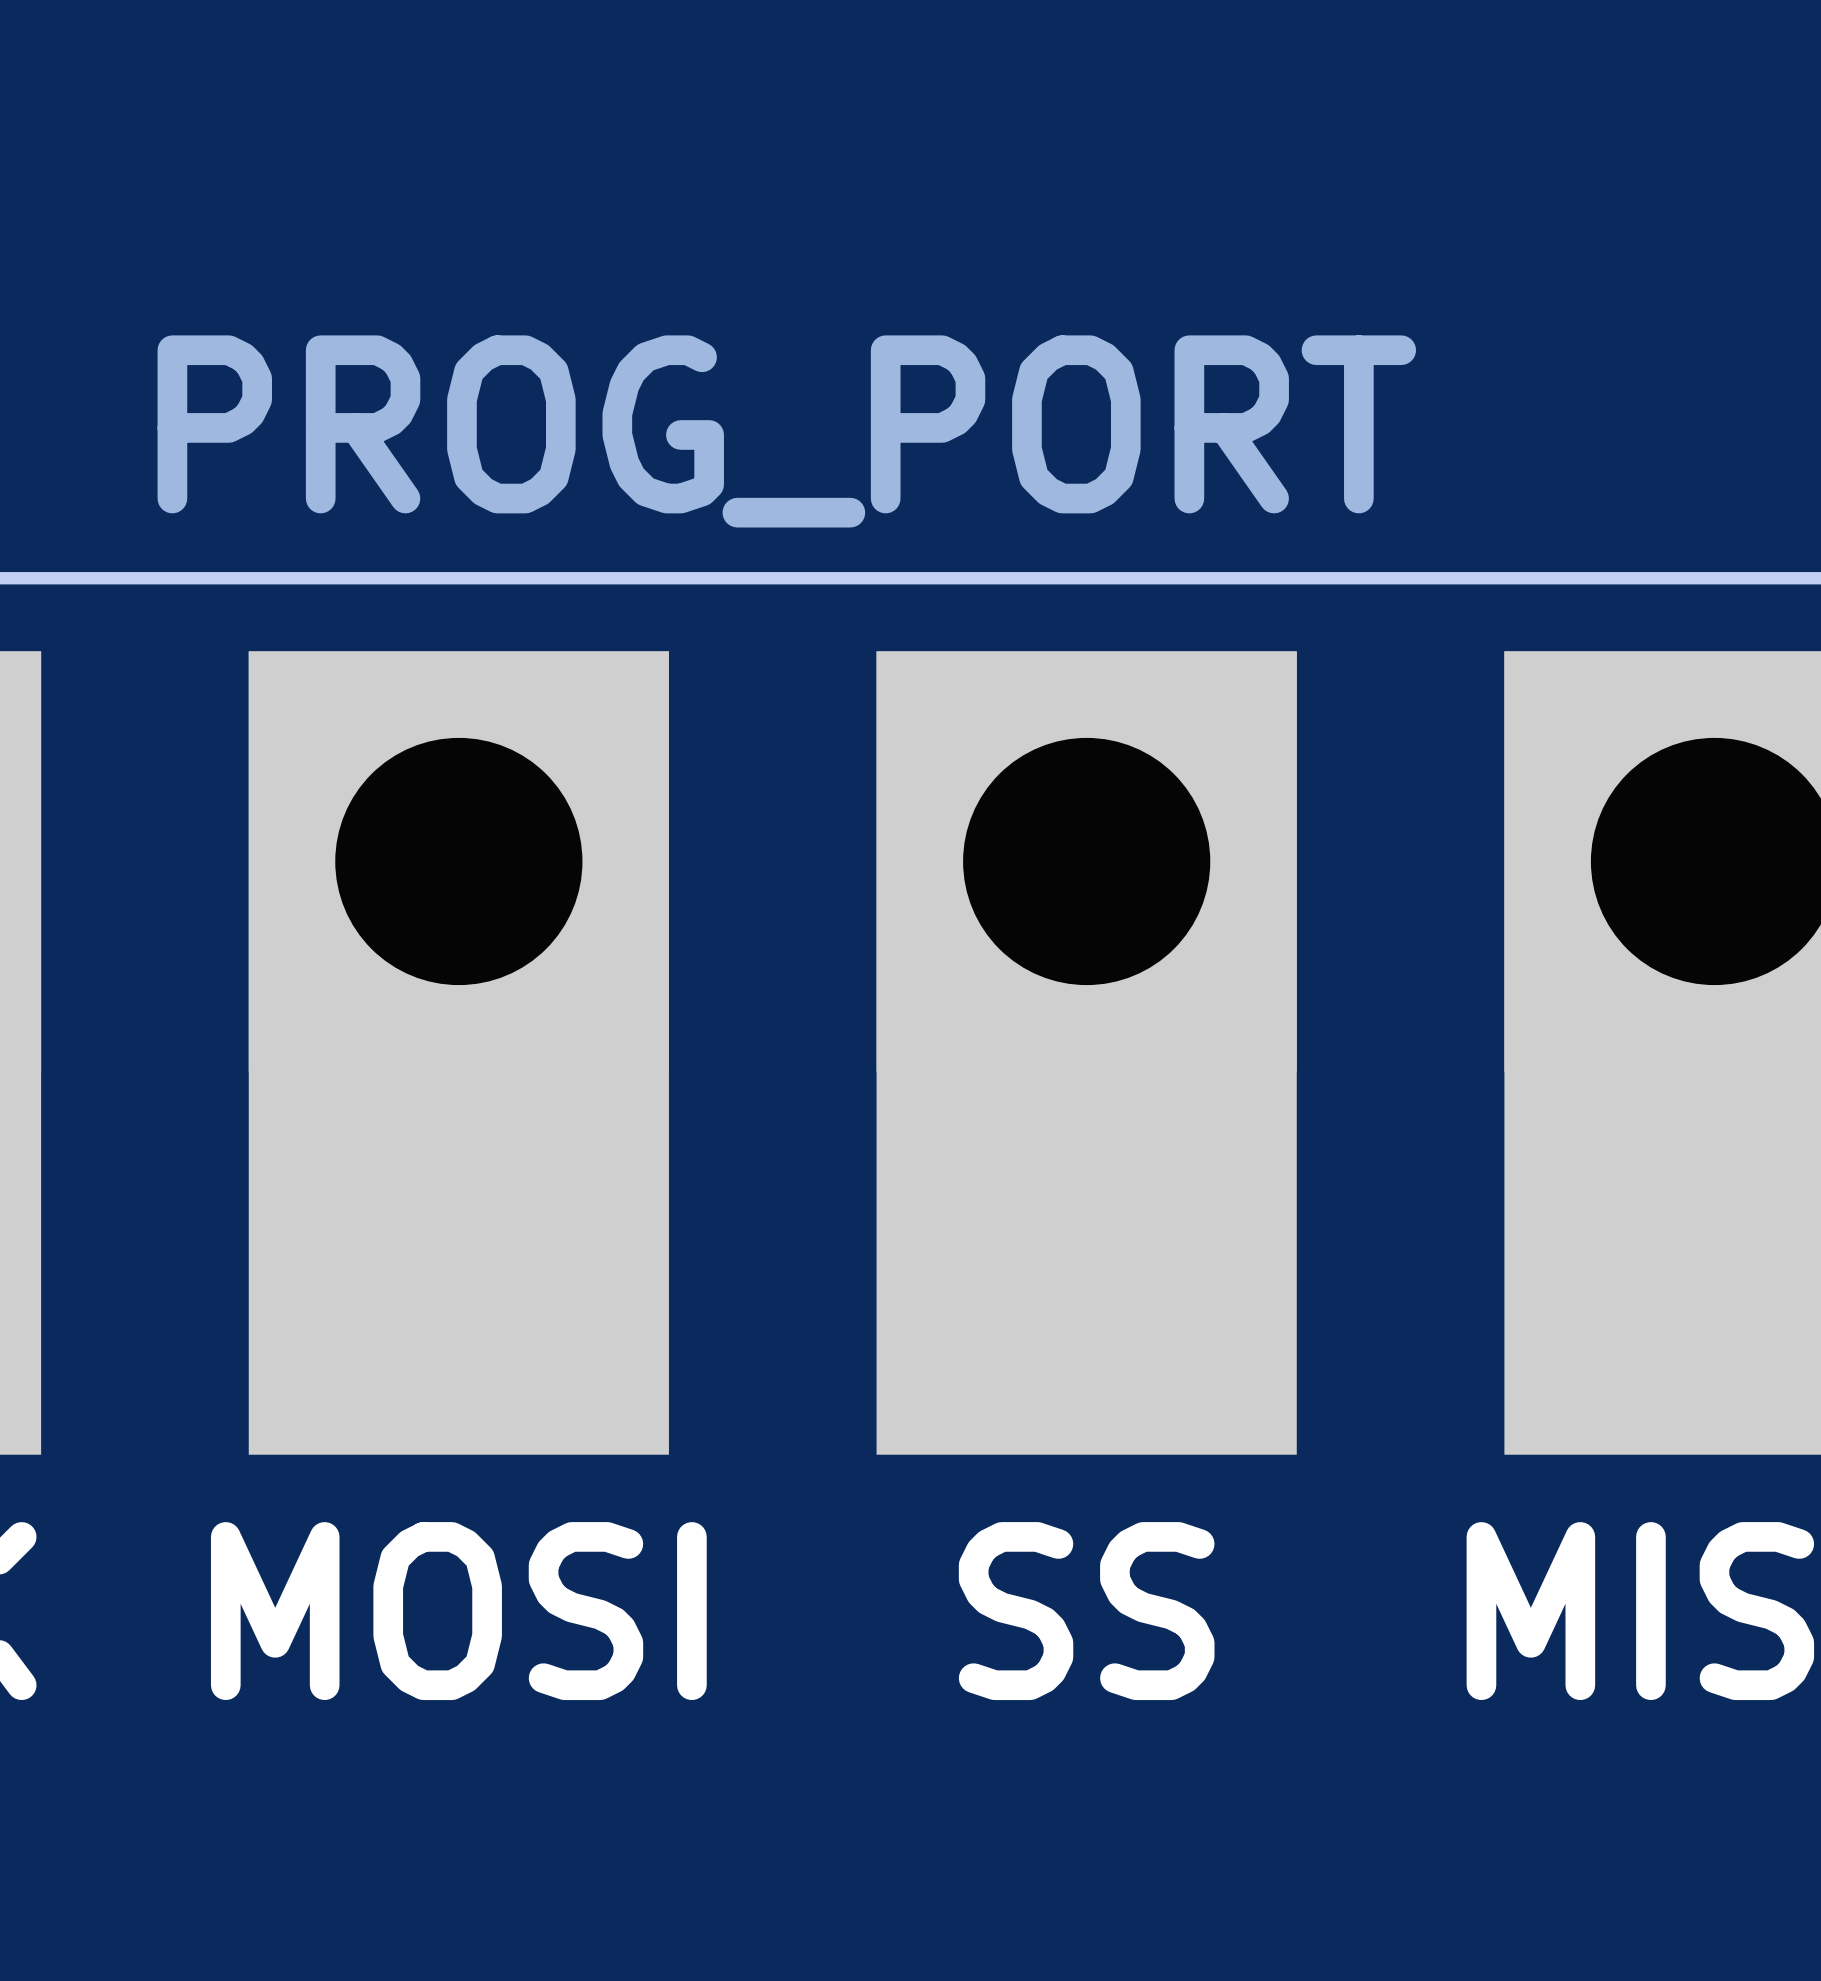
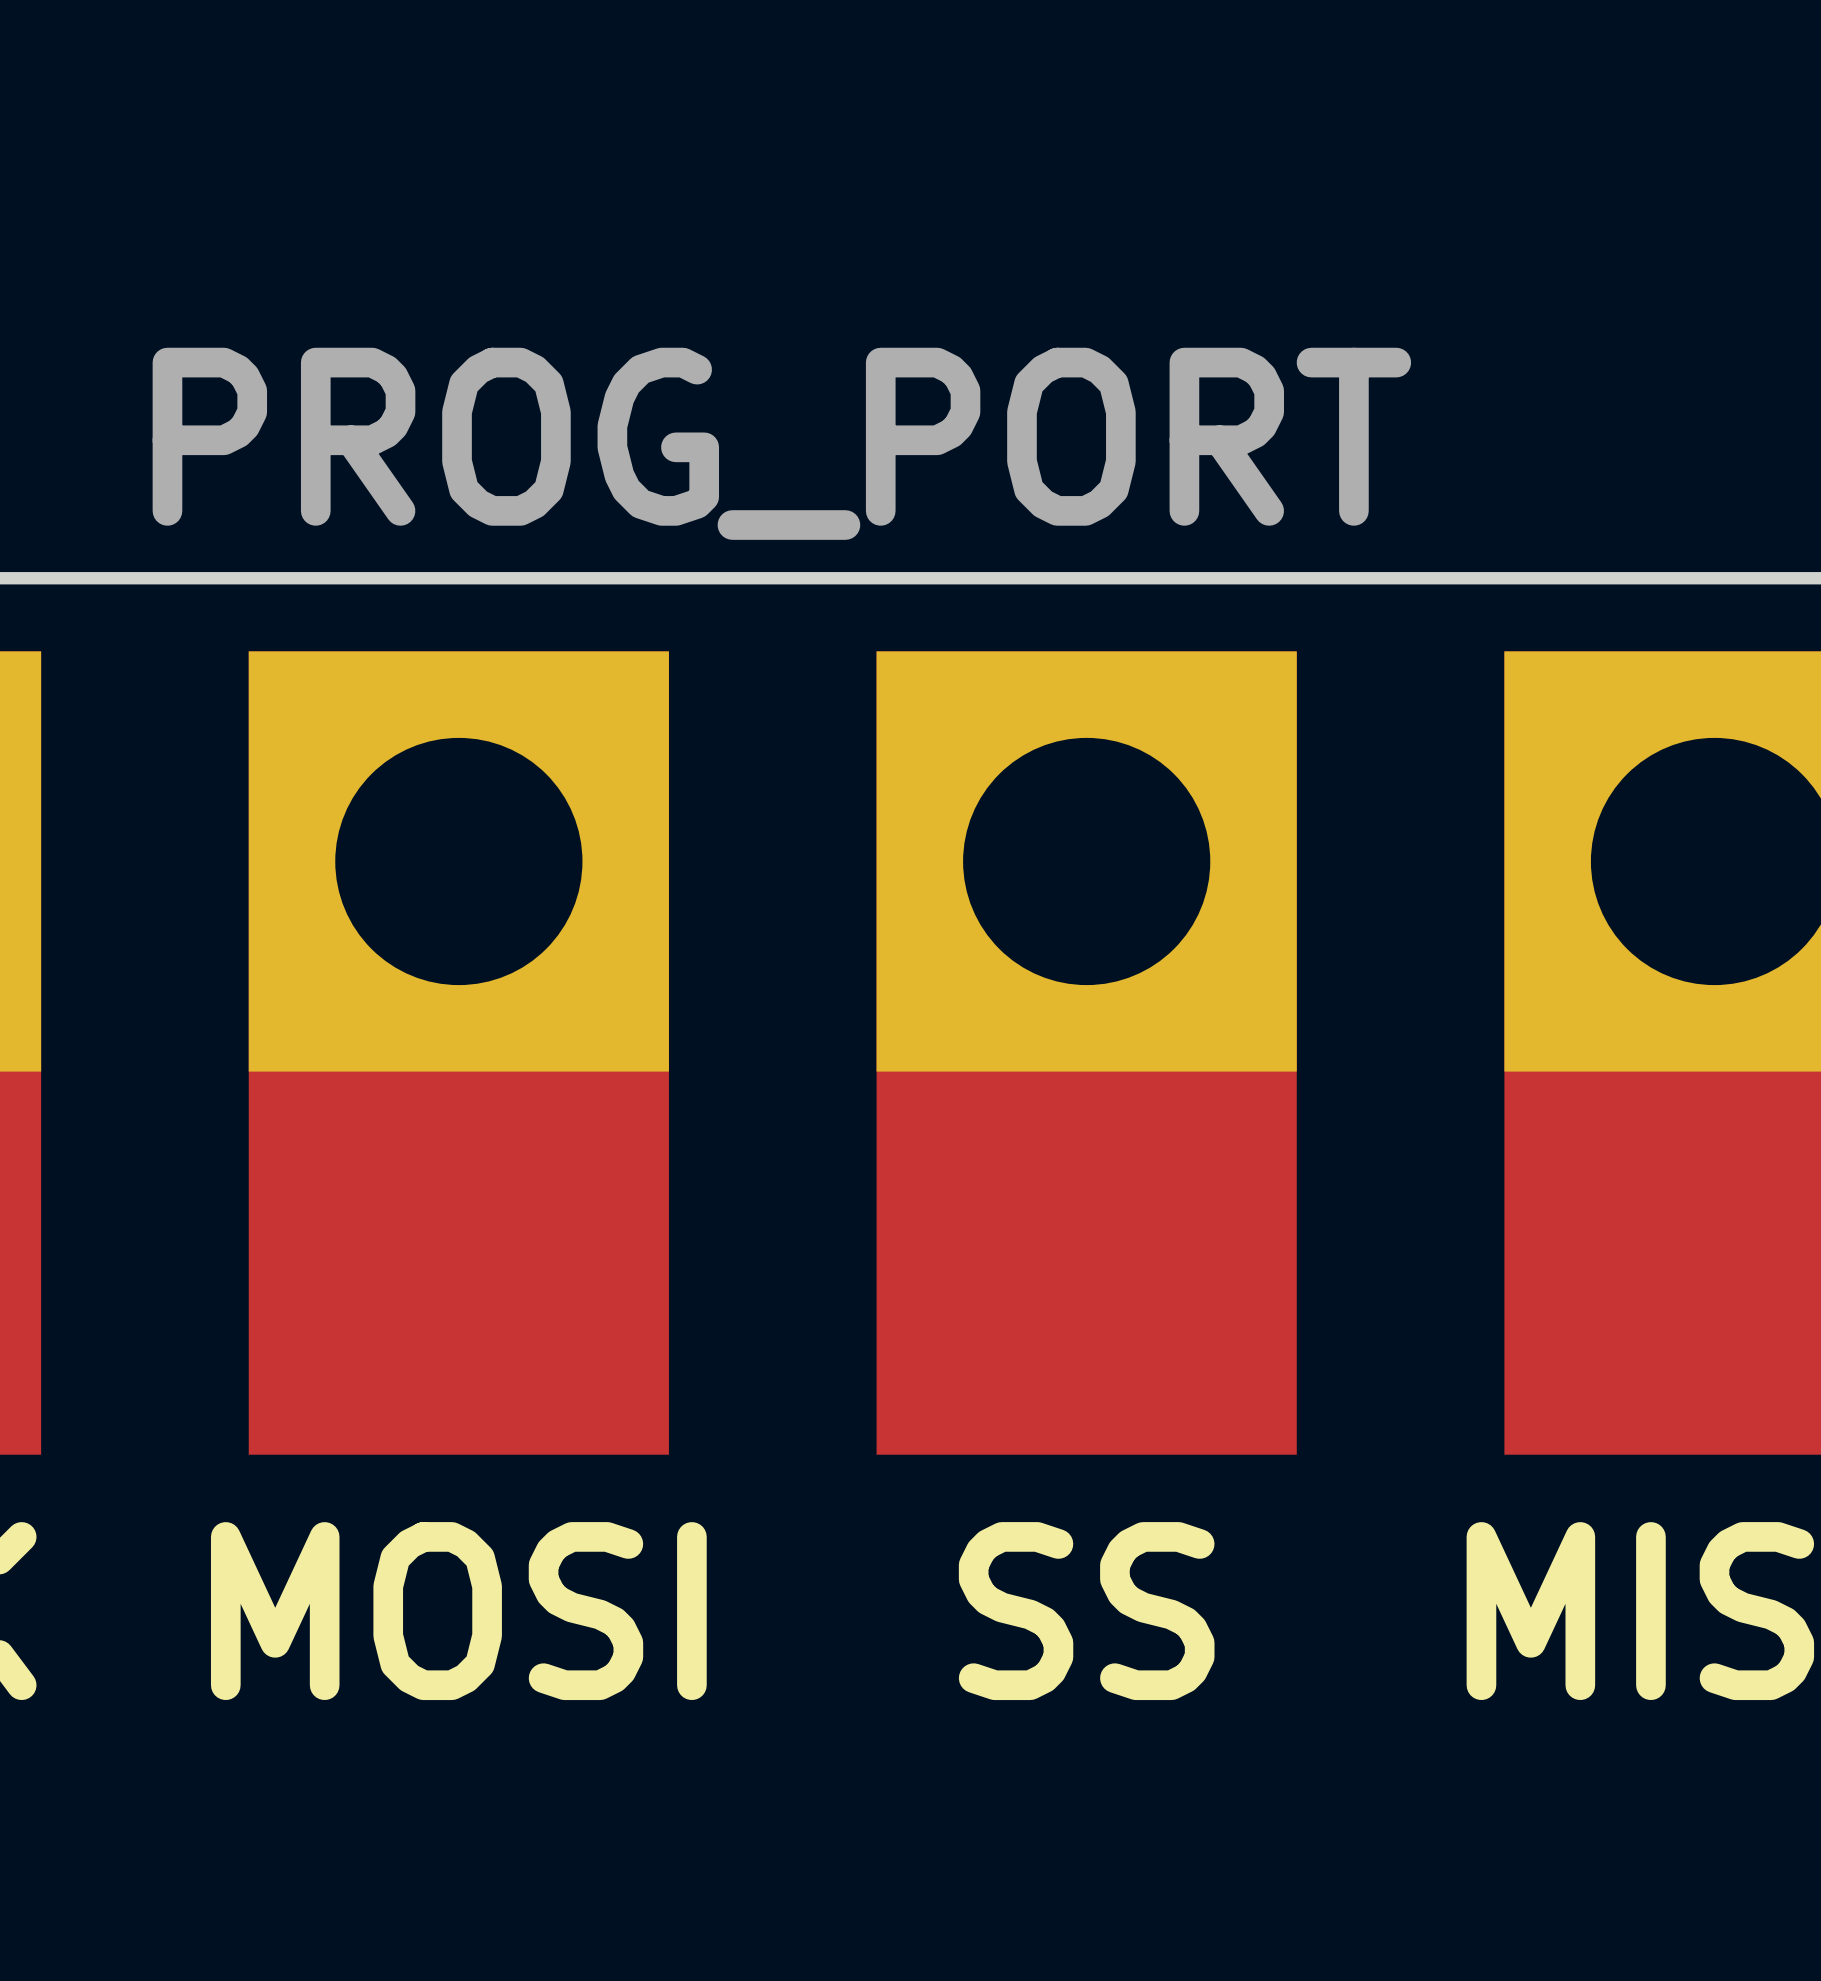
part value position: PROG_PORT (786, 431) -> PROG_PORT (781, 443)

